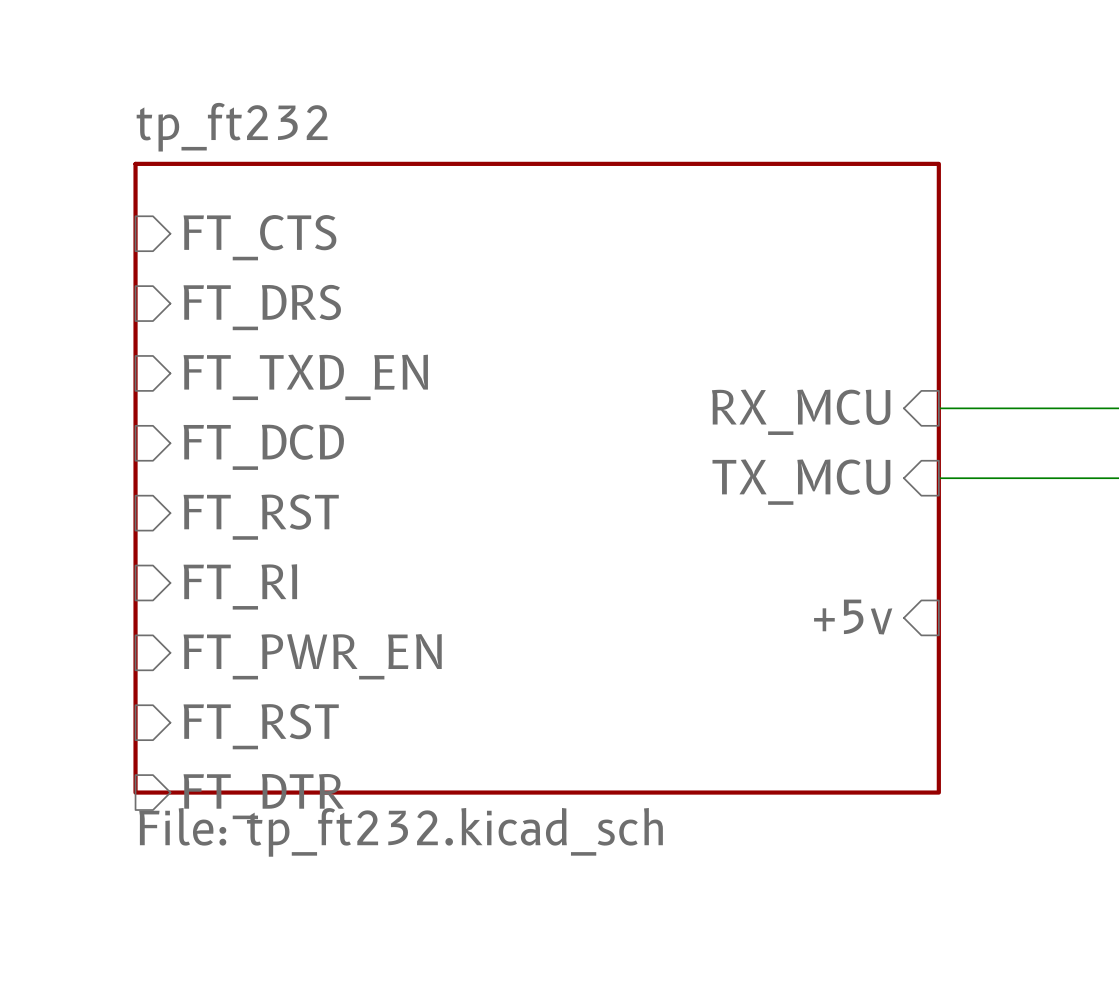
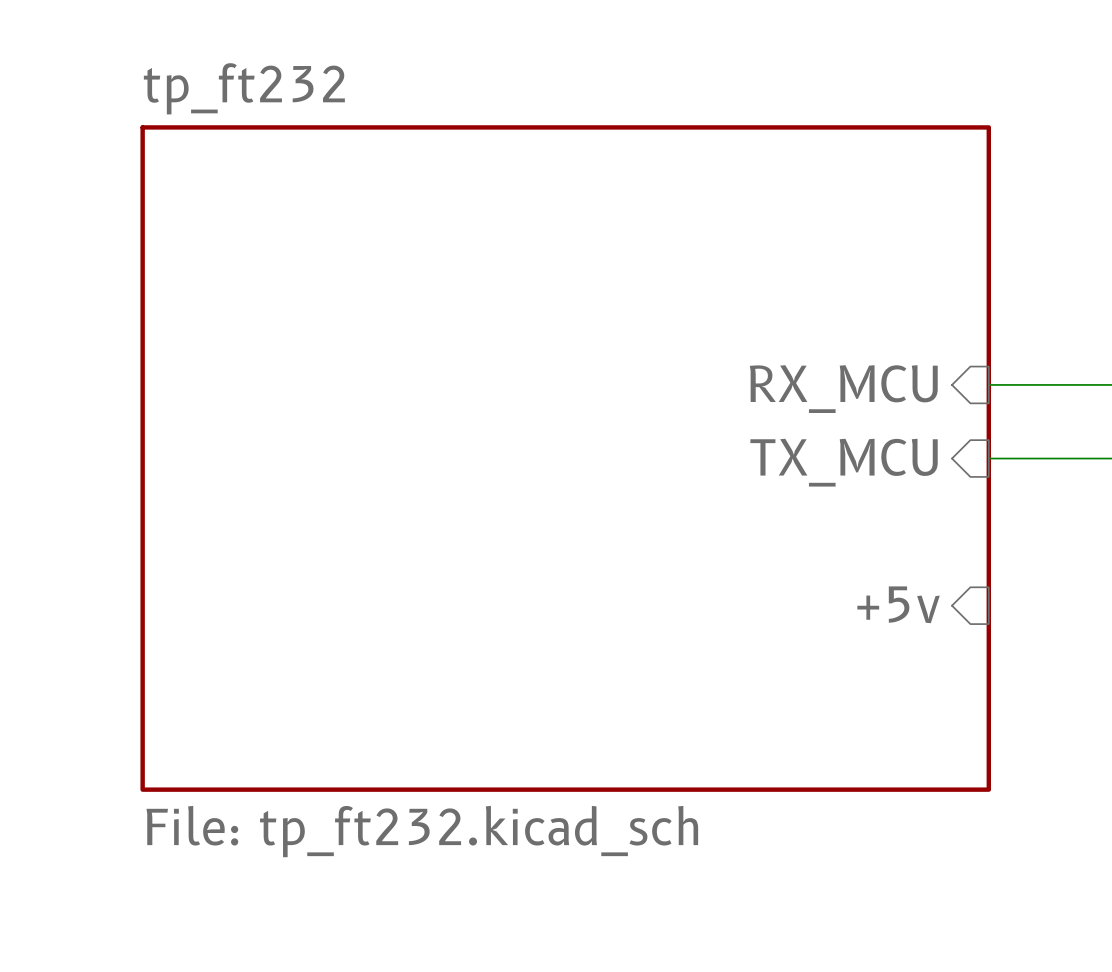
sheet pin: FT_CTS (259, 237) -> none
sheet pin: FT_DRS (262, 307) -> none
sheet pin: FT_TXD_EN (305, 377) -> none
sheet pin: FT_DCD (263, 447) -> none
sheet pin: FT_RST (261, 517) -> none
sheet pin: FT_RI (240, 586) -> none
sheet pin: FT_PWR_EN (312, 656) -> none
sheet pin: FT_RST (261, 726) -> none
sheet pin: FT_DTR (263, 796) -> none

